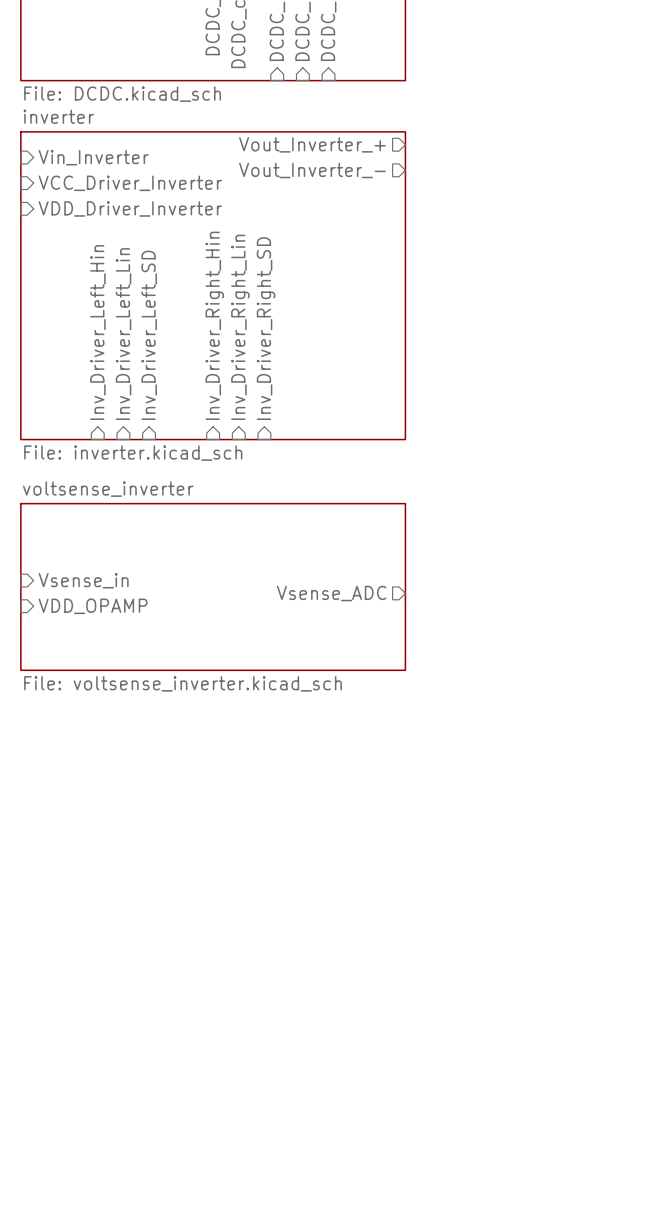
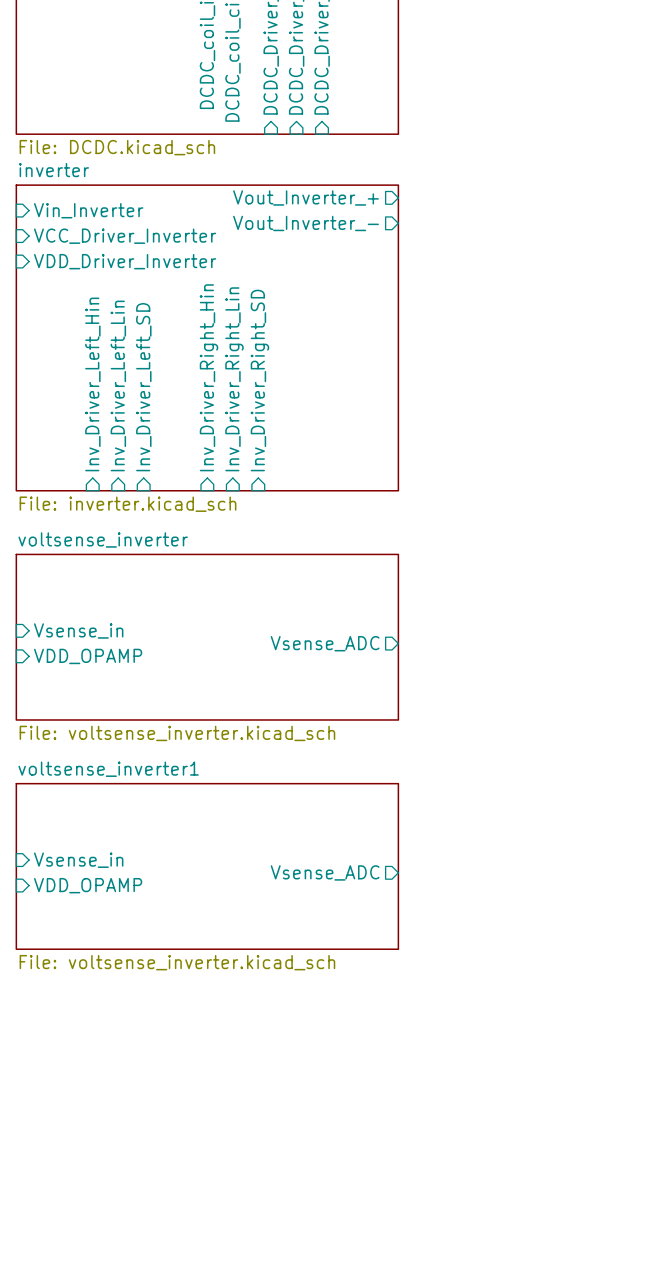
sheet pin: none -> Vsense_in (78, 860)
sheet voltsense_inverter1: none -> File: voltsense_inverter.kicad_sch (207, 866)
sheet pin: none -> Vsense_ADC (325, 872)
sheet pin: none -> VDD_OPAMP (88, 885)

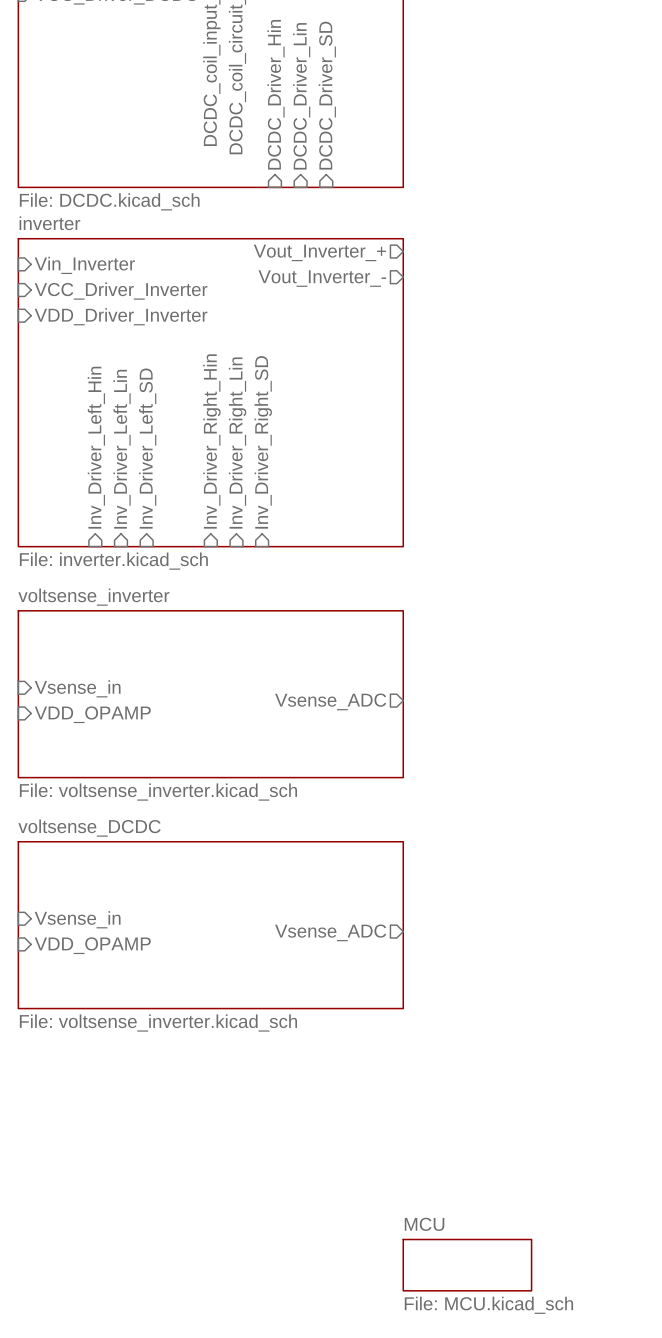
sheet voltsense_inverter1 name: voltsense_inverter1 (108, 769) -> voltsense_DCDC (89, 828)
sheet MCU: none -> File: MCU.kicad_sch (467, 1265)

